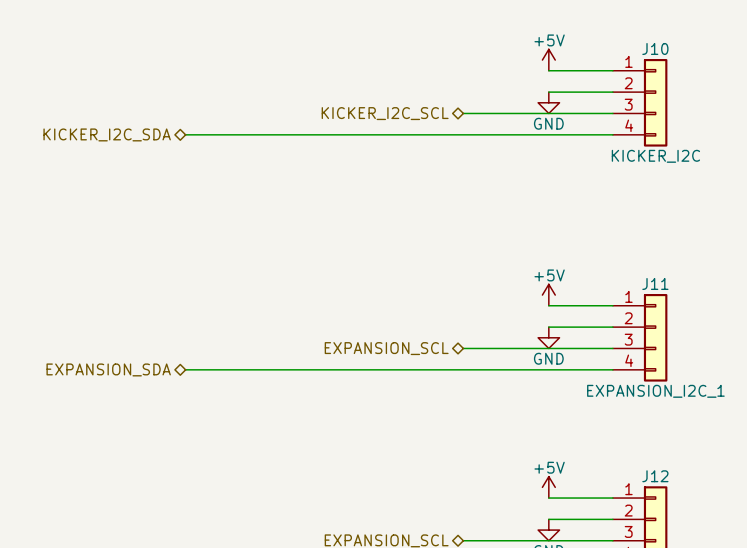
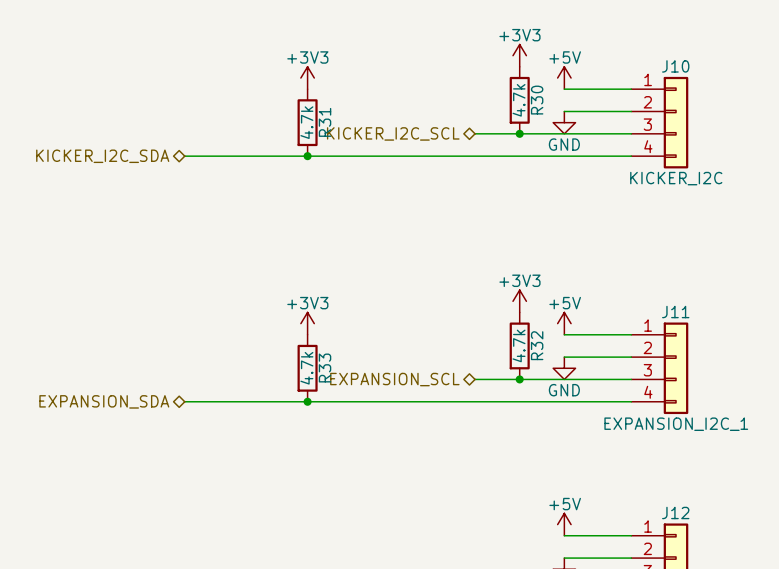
power symbol: none -> +3V3 (519, 55)
power symbol: none -> +3V3 (307, 78)
R30: none -> 4.7k (519, 100)
R31: none -> 4.7k (307, 122)
junction: none -> (519, 133)
junction: none -> (307, 156)
power symbol: none -> +3V3 (519, 301)
power symbol: none -> +3V3 (307, 323)
R32: none -> 4.7k (519, 345)
R33: none -> 4.7k (307, 368)
junction: none -> (519, 379)
junction: none -> (307, 401)

